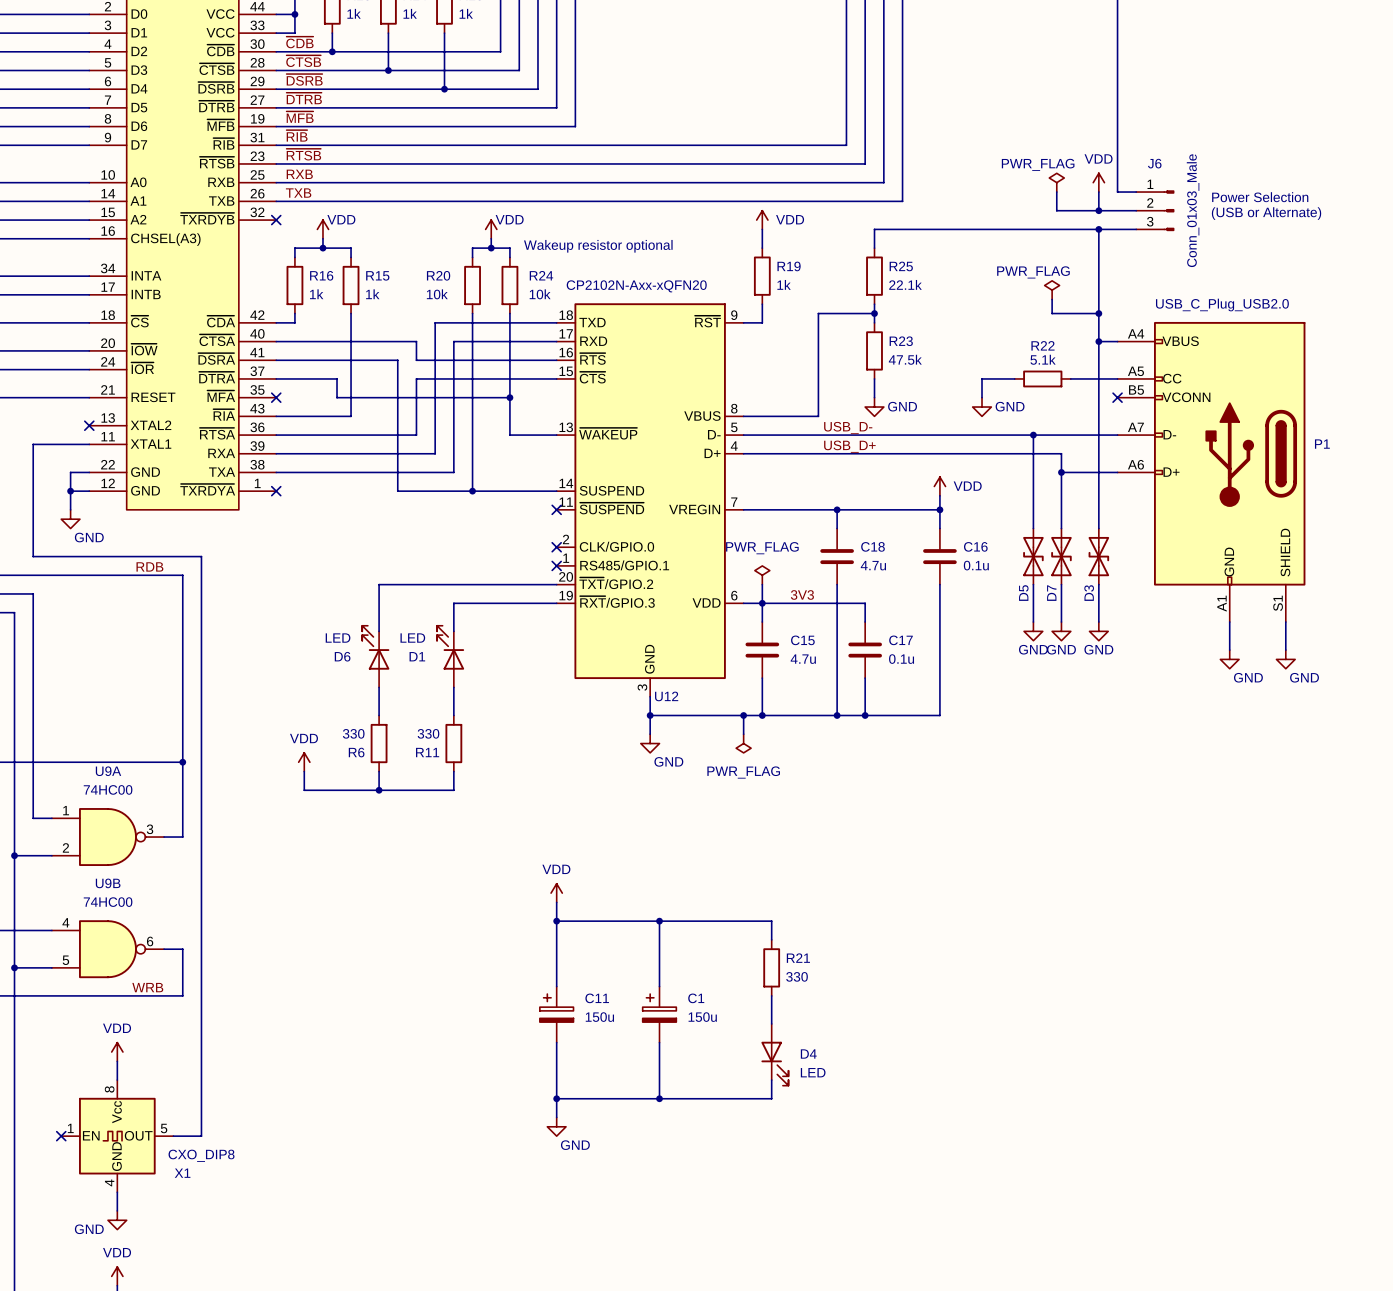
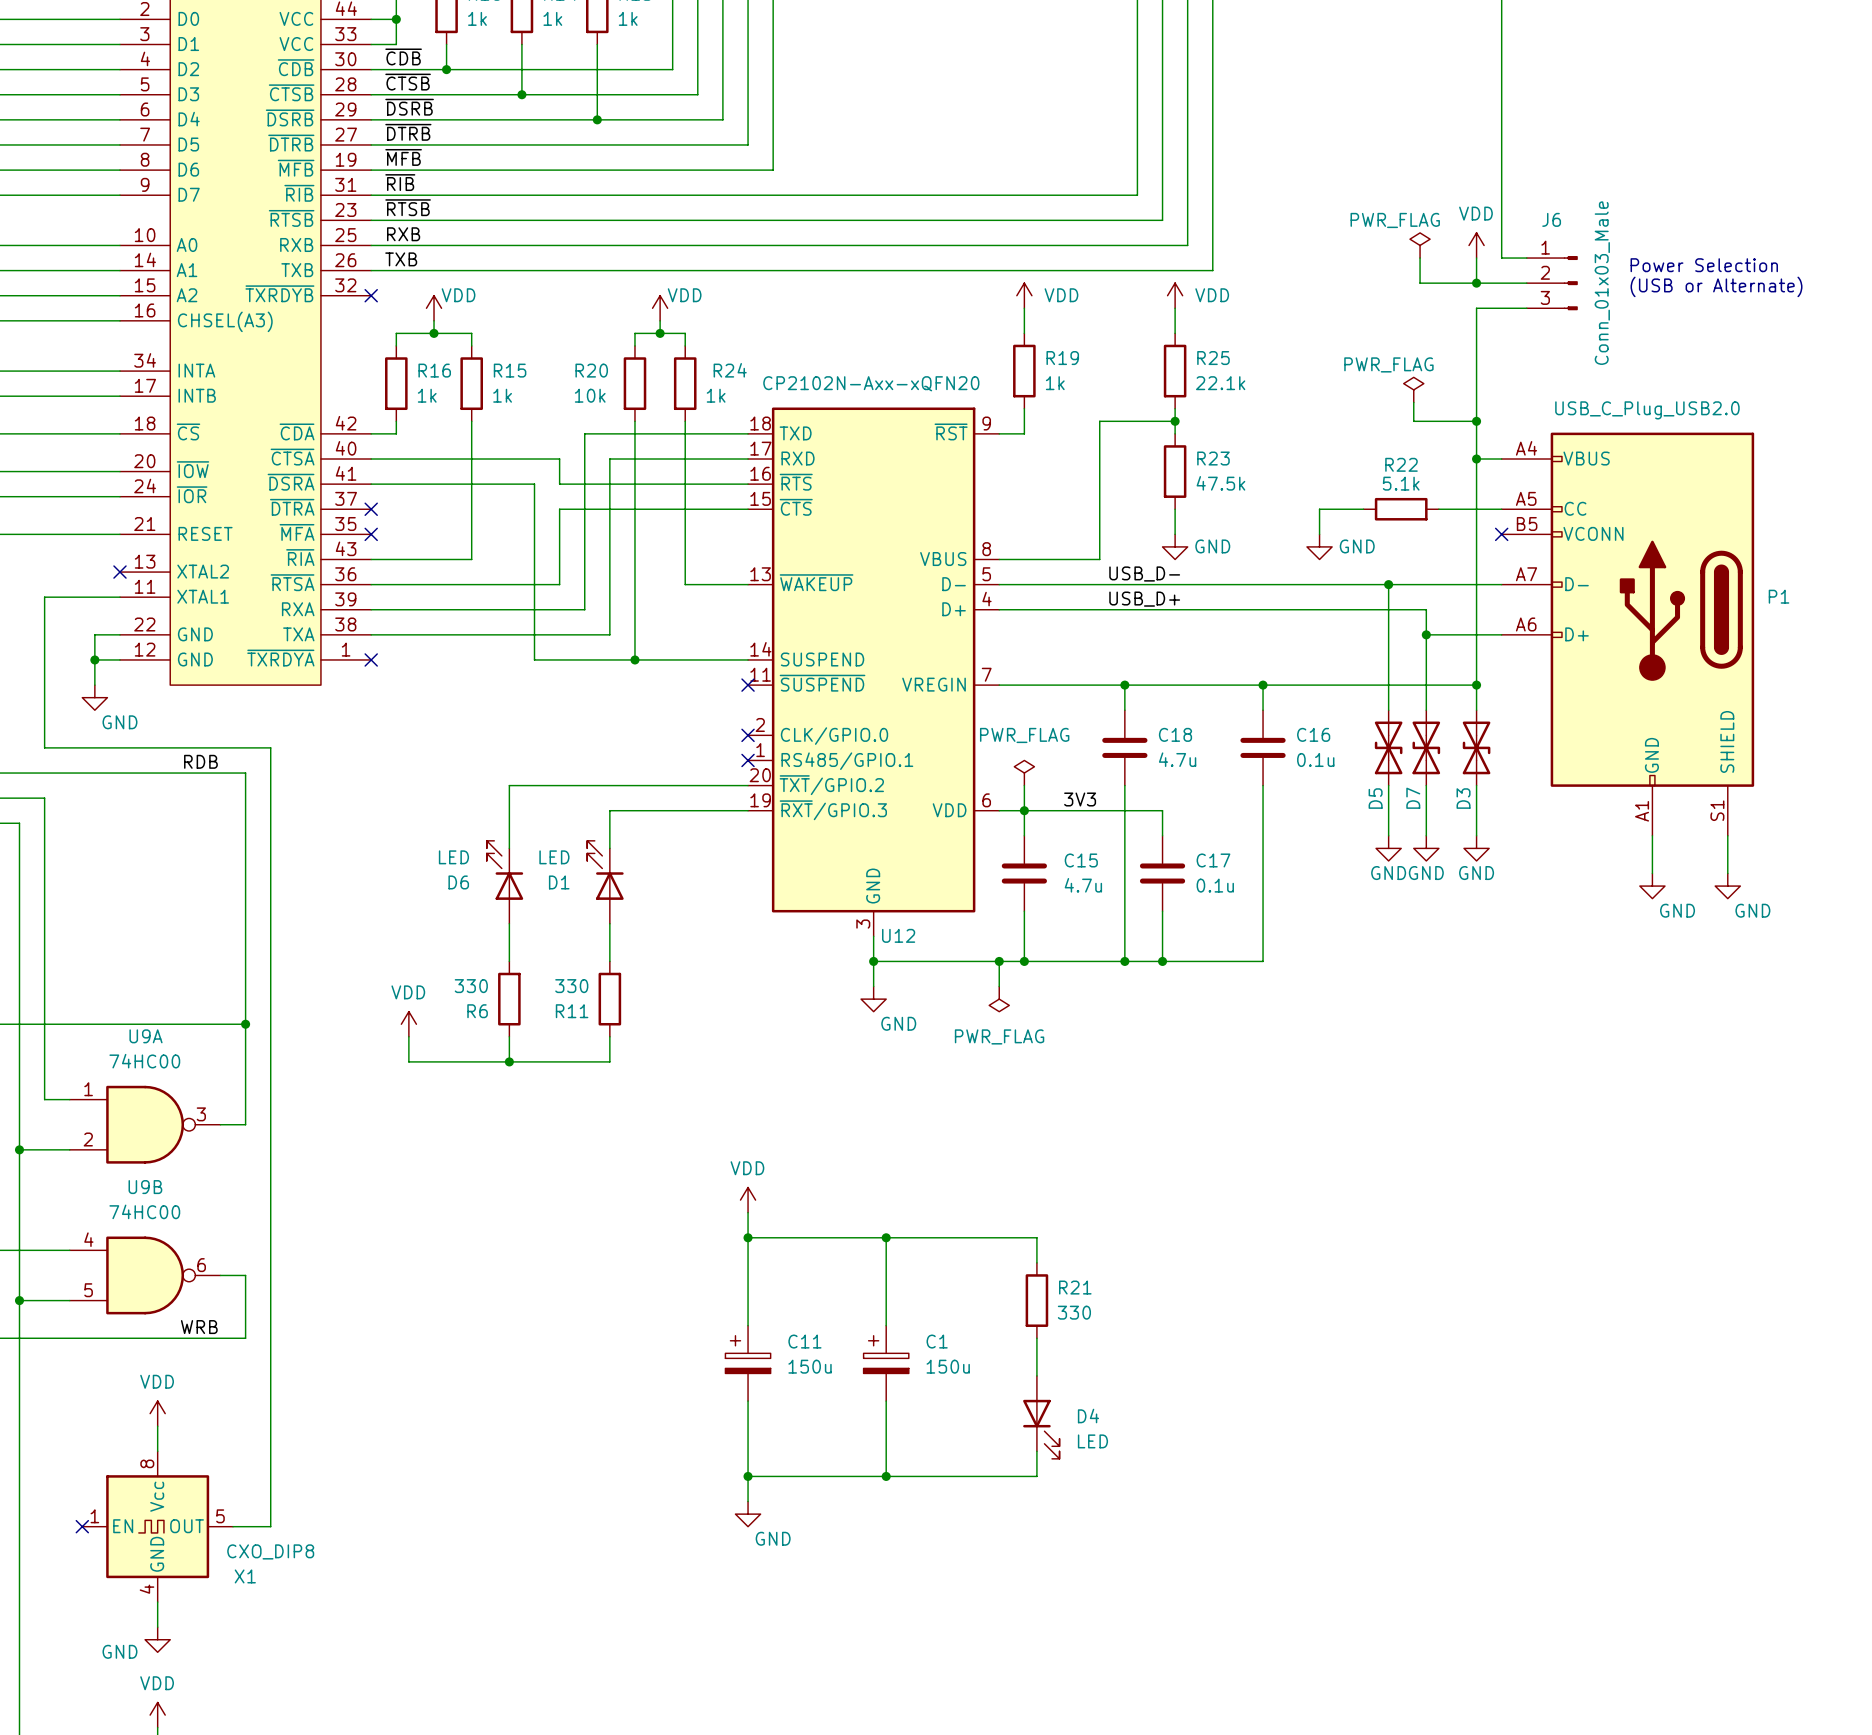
power symbol: none -> VDD (1175, 295)
wire: (874, 229) (1098, 229) -> none
junction: (1098, 229) -> none
text: Wakeup resistor optional (598, 246) -> none
R24 value: 10k (540, 294) -> 1k (716, 395)
wire: (276, 378) (337, 378) (337, 397) (509, 397) -> none
no-connect mark: none -> (371, 509)
junction: (509, 397) -> none
power symbol: VDD (939, 486) -> none
wire: (939, 495) (939, 509) -> (1476, 685) (1263, 685)
junction: none -> (1476, 685)

